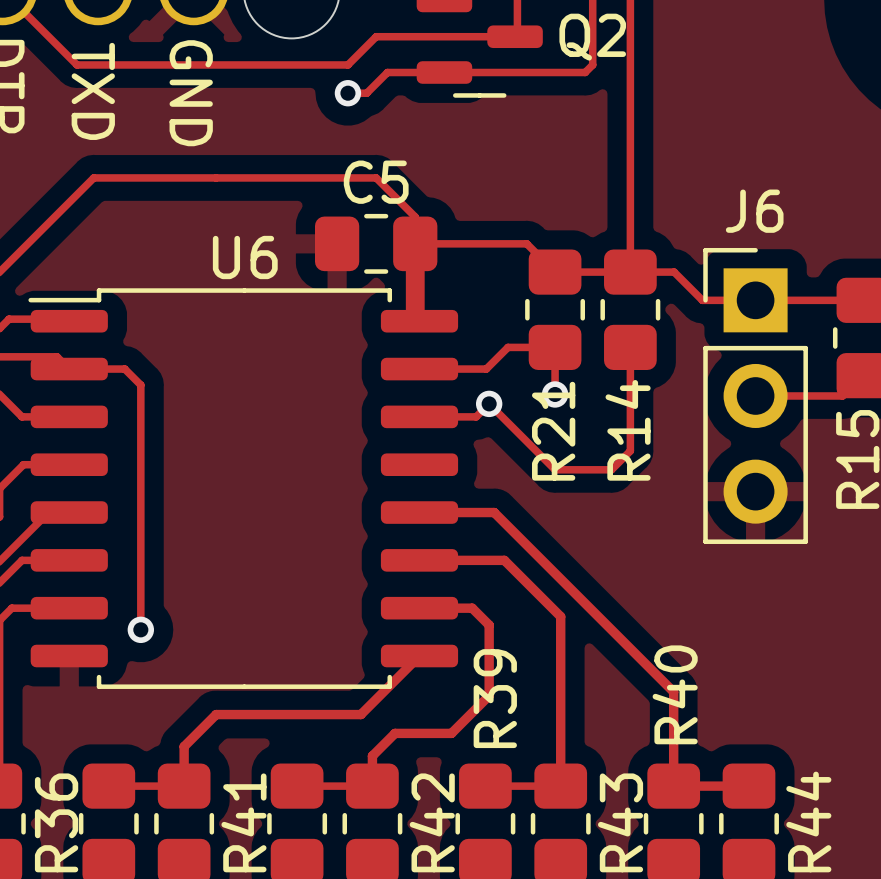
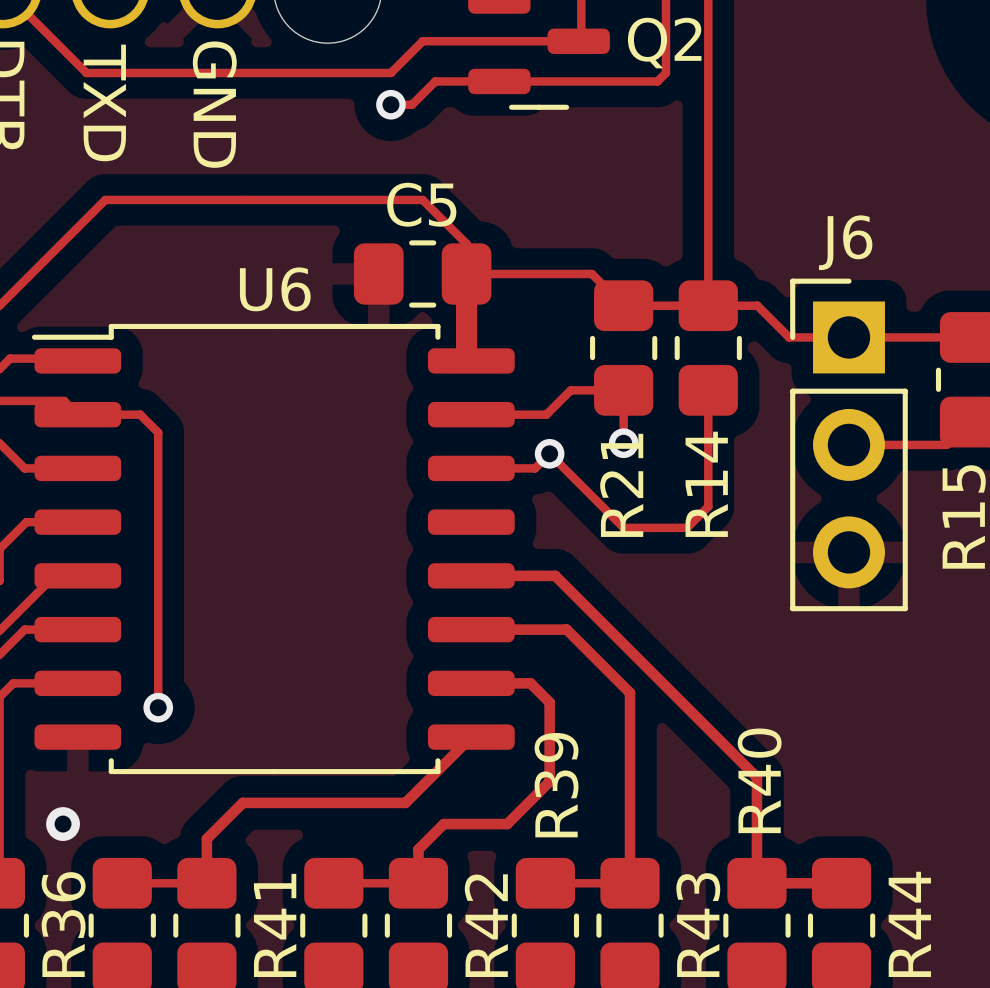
via: none -> (63, 824)

